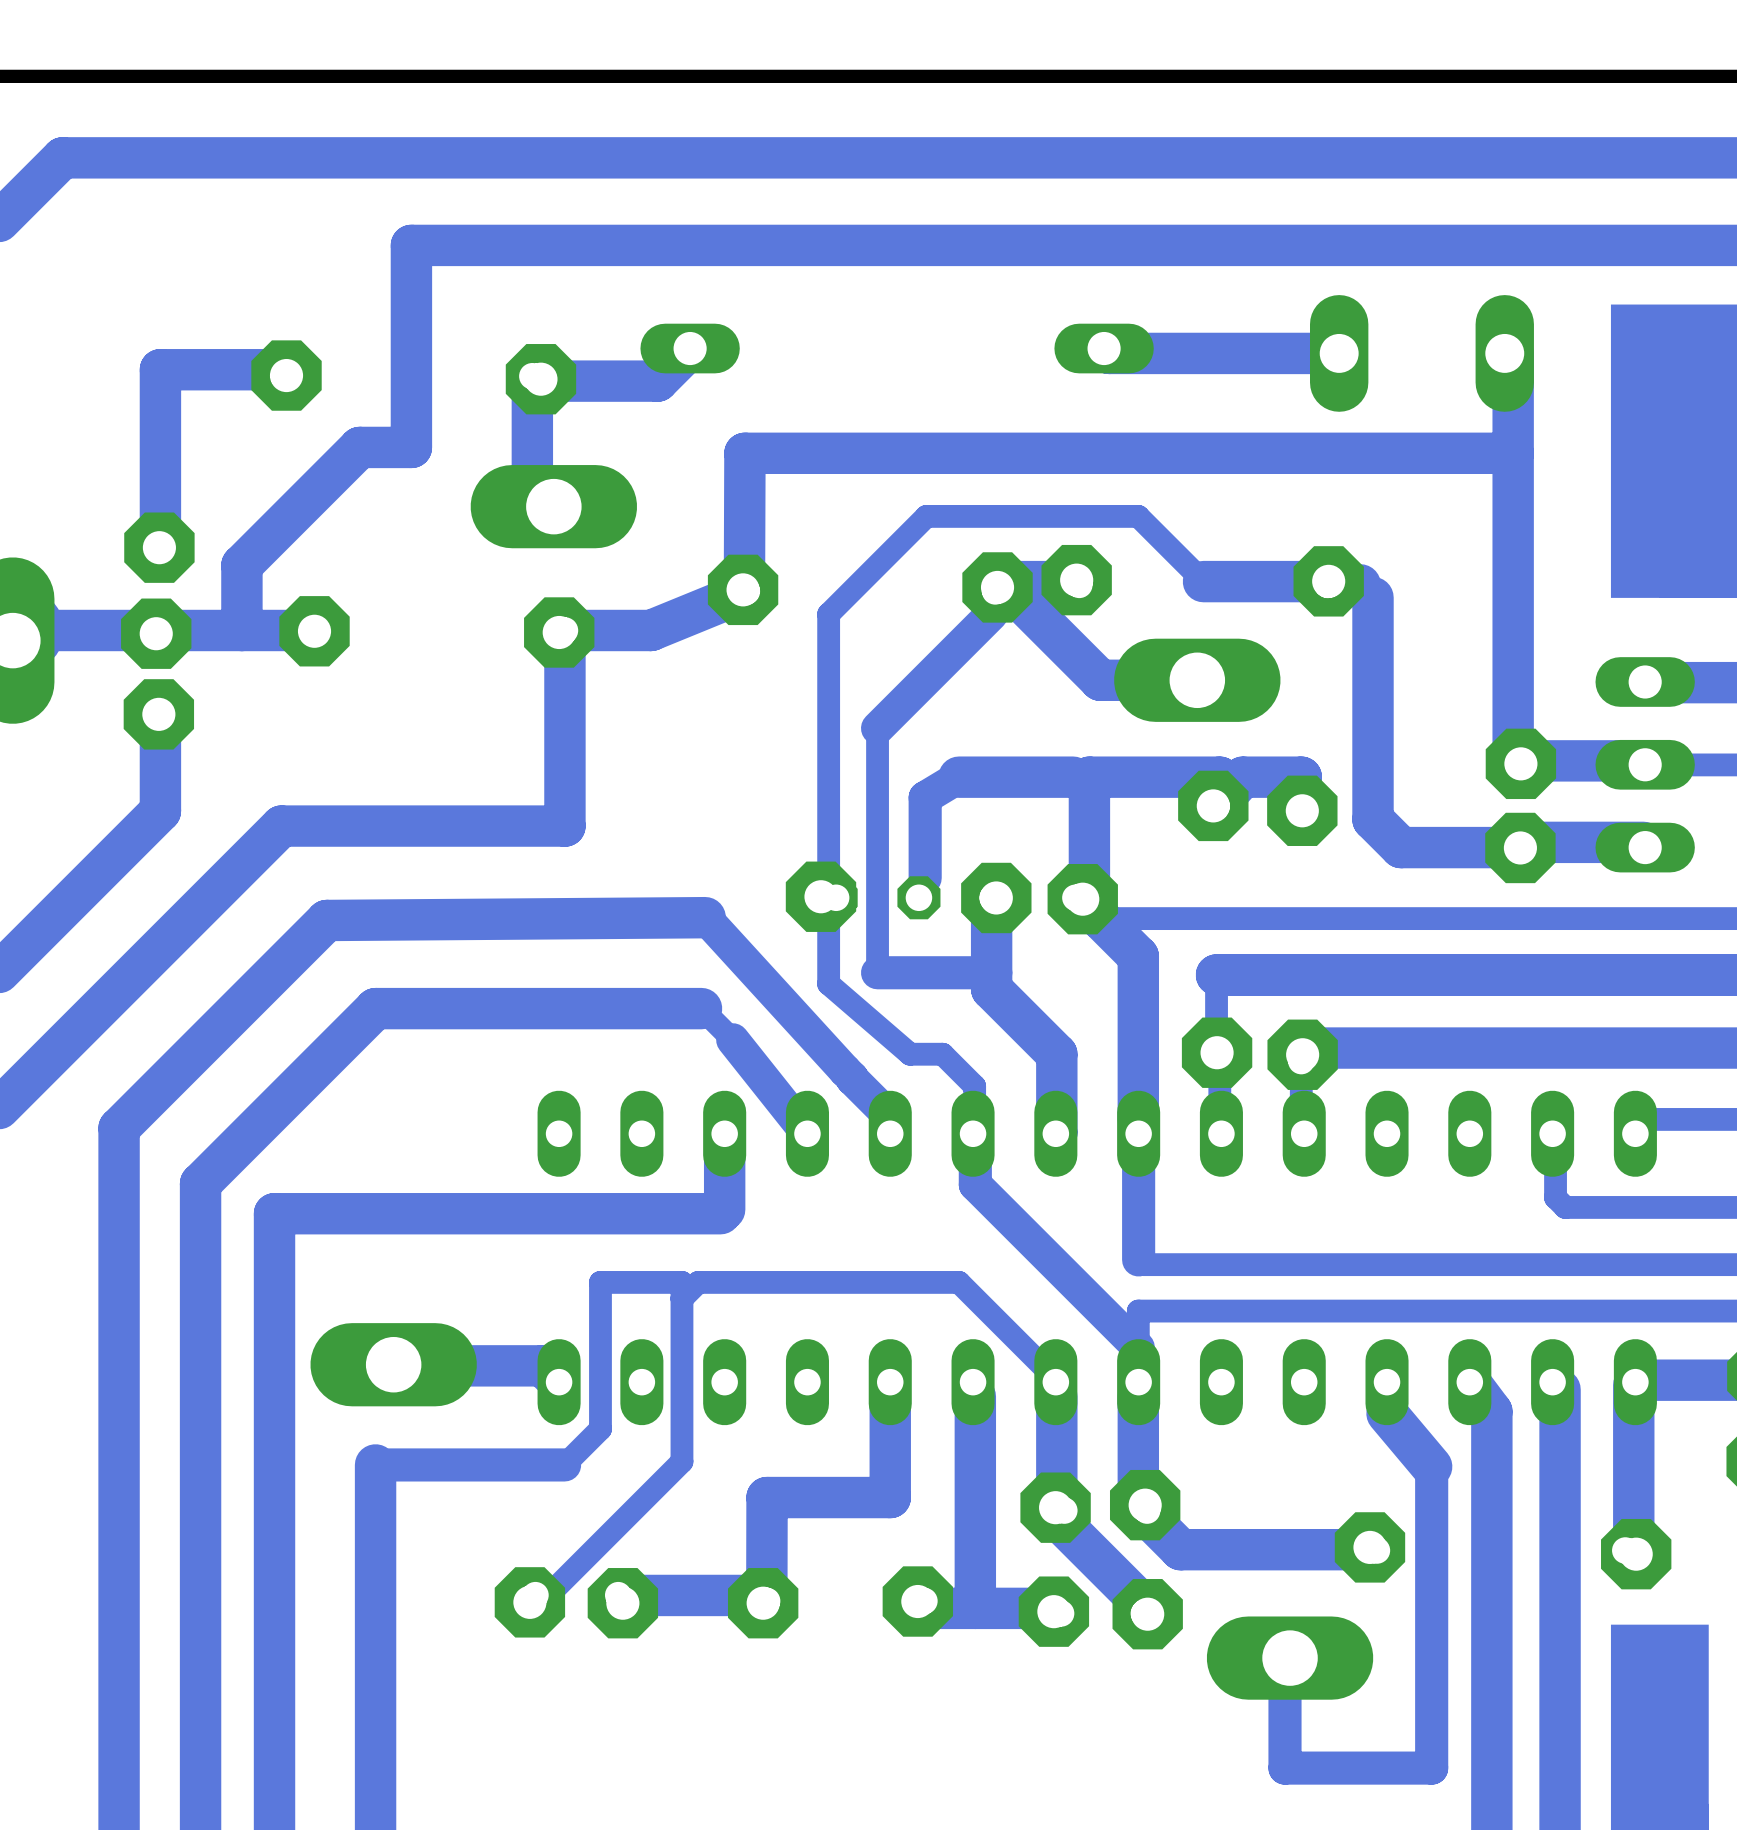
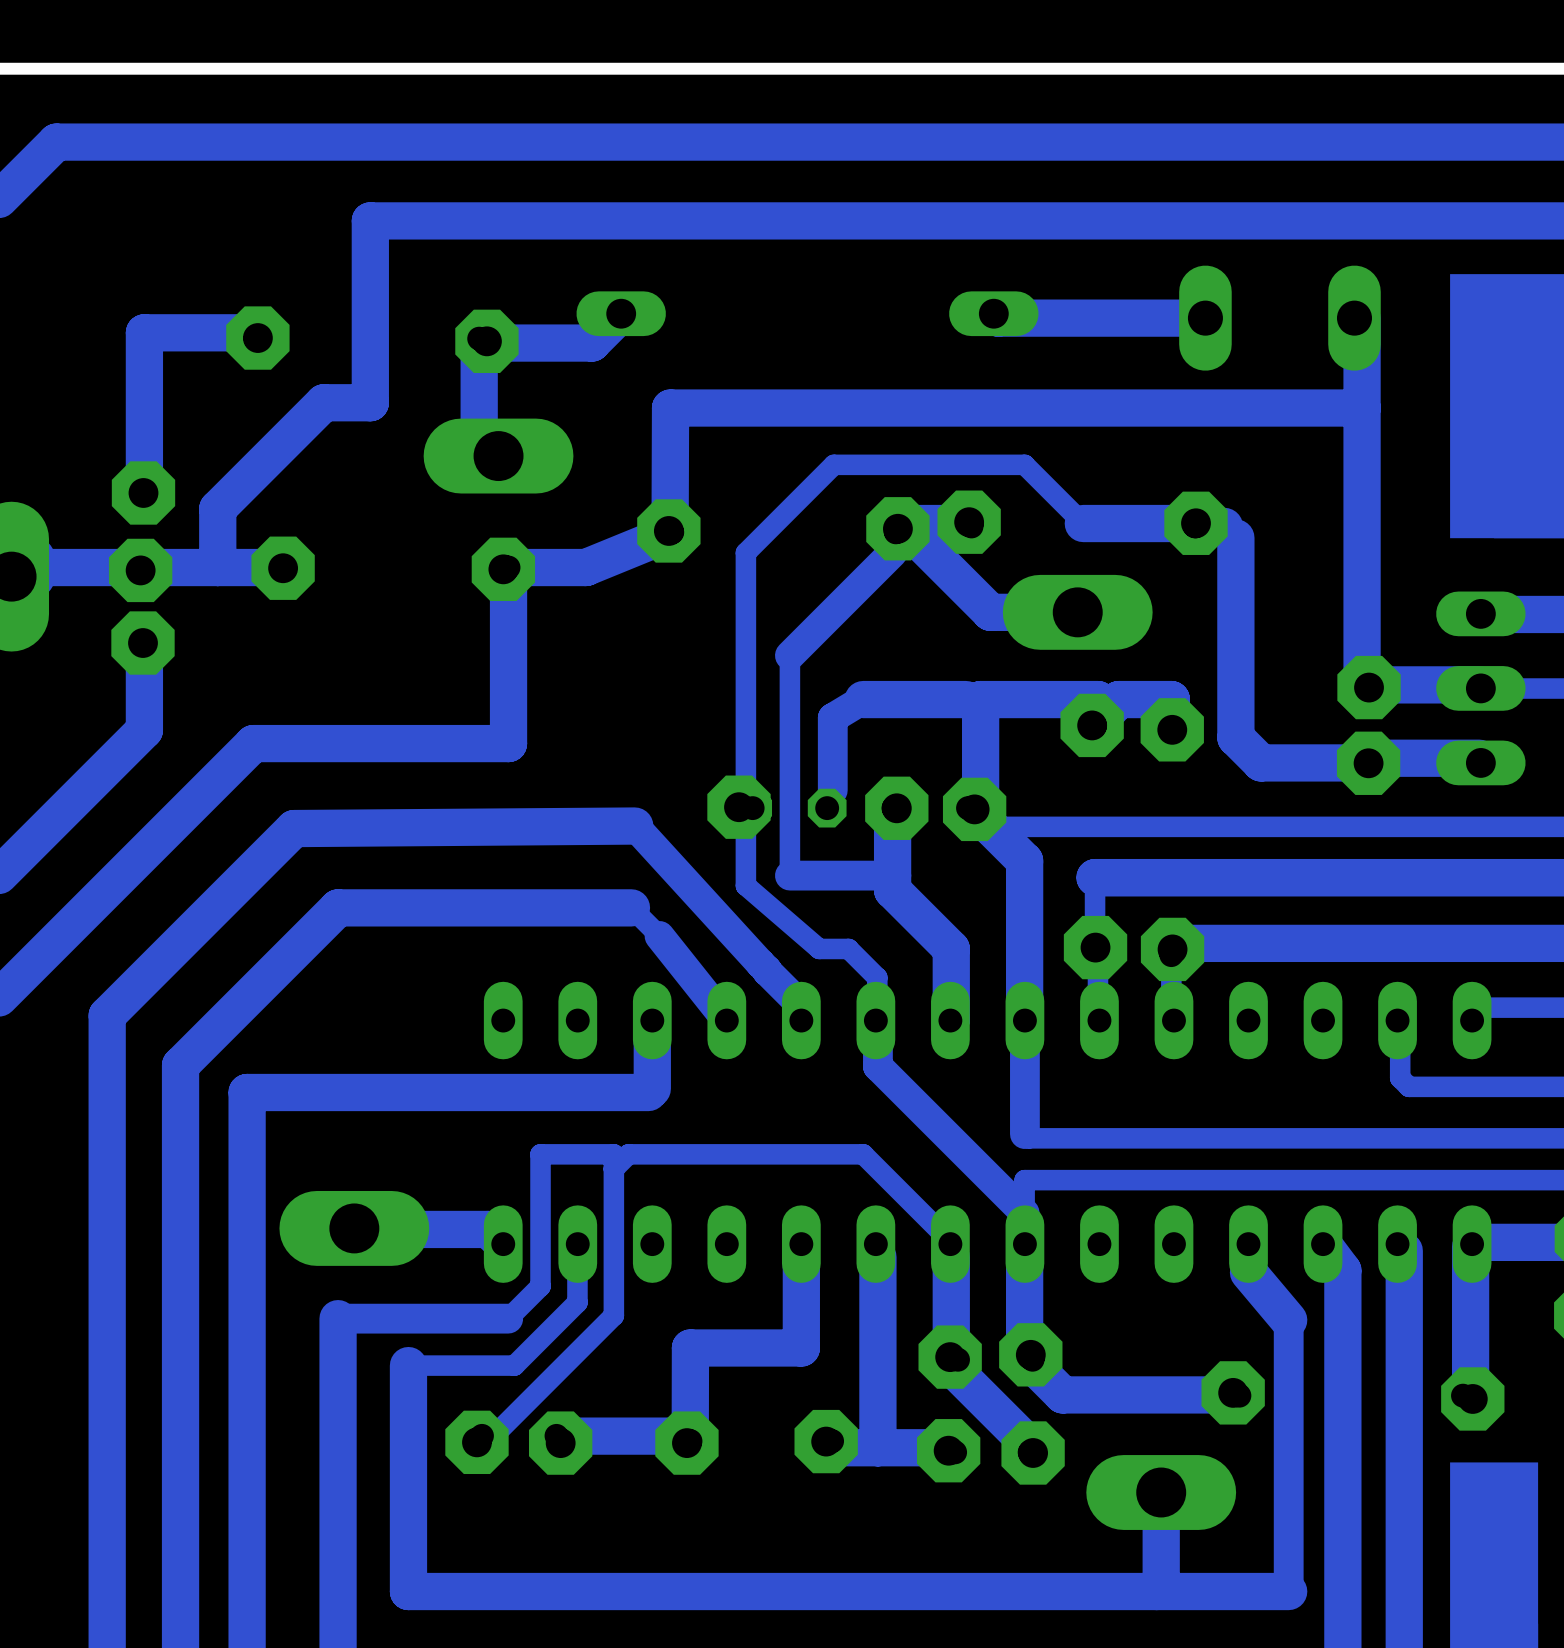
bottom track: (1290, 1658) (1284, 1663) (1284, 1768) -> (1161, 1492) (1161, 1586) (1156, 1591) (408, 1591) (408, 1365) (514, 1365) (577, 1302) (577, 1244)
bottom track width: thin (1431, 1768) (1284, 1768) -> thick (1288, 1591) (1156, 1591)

